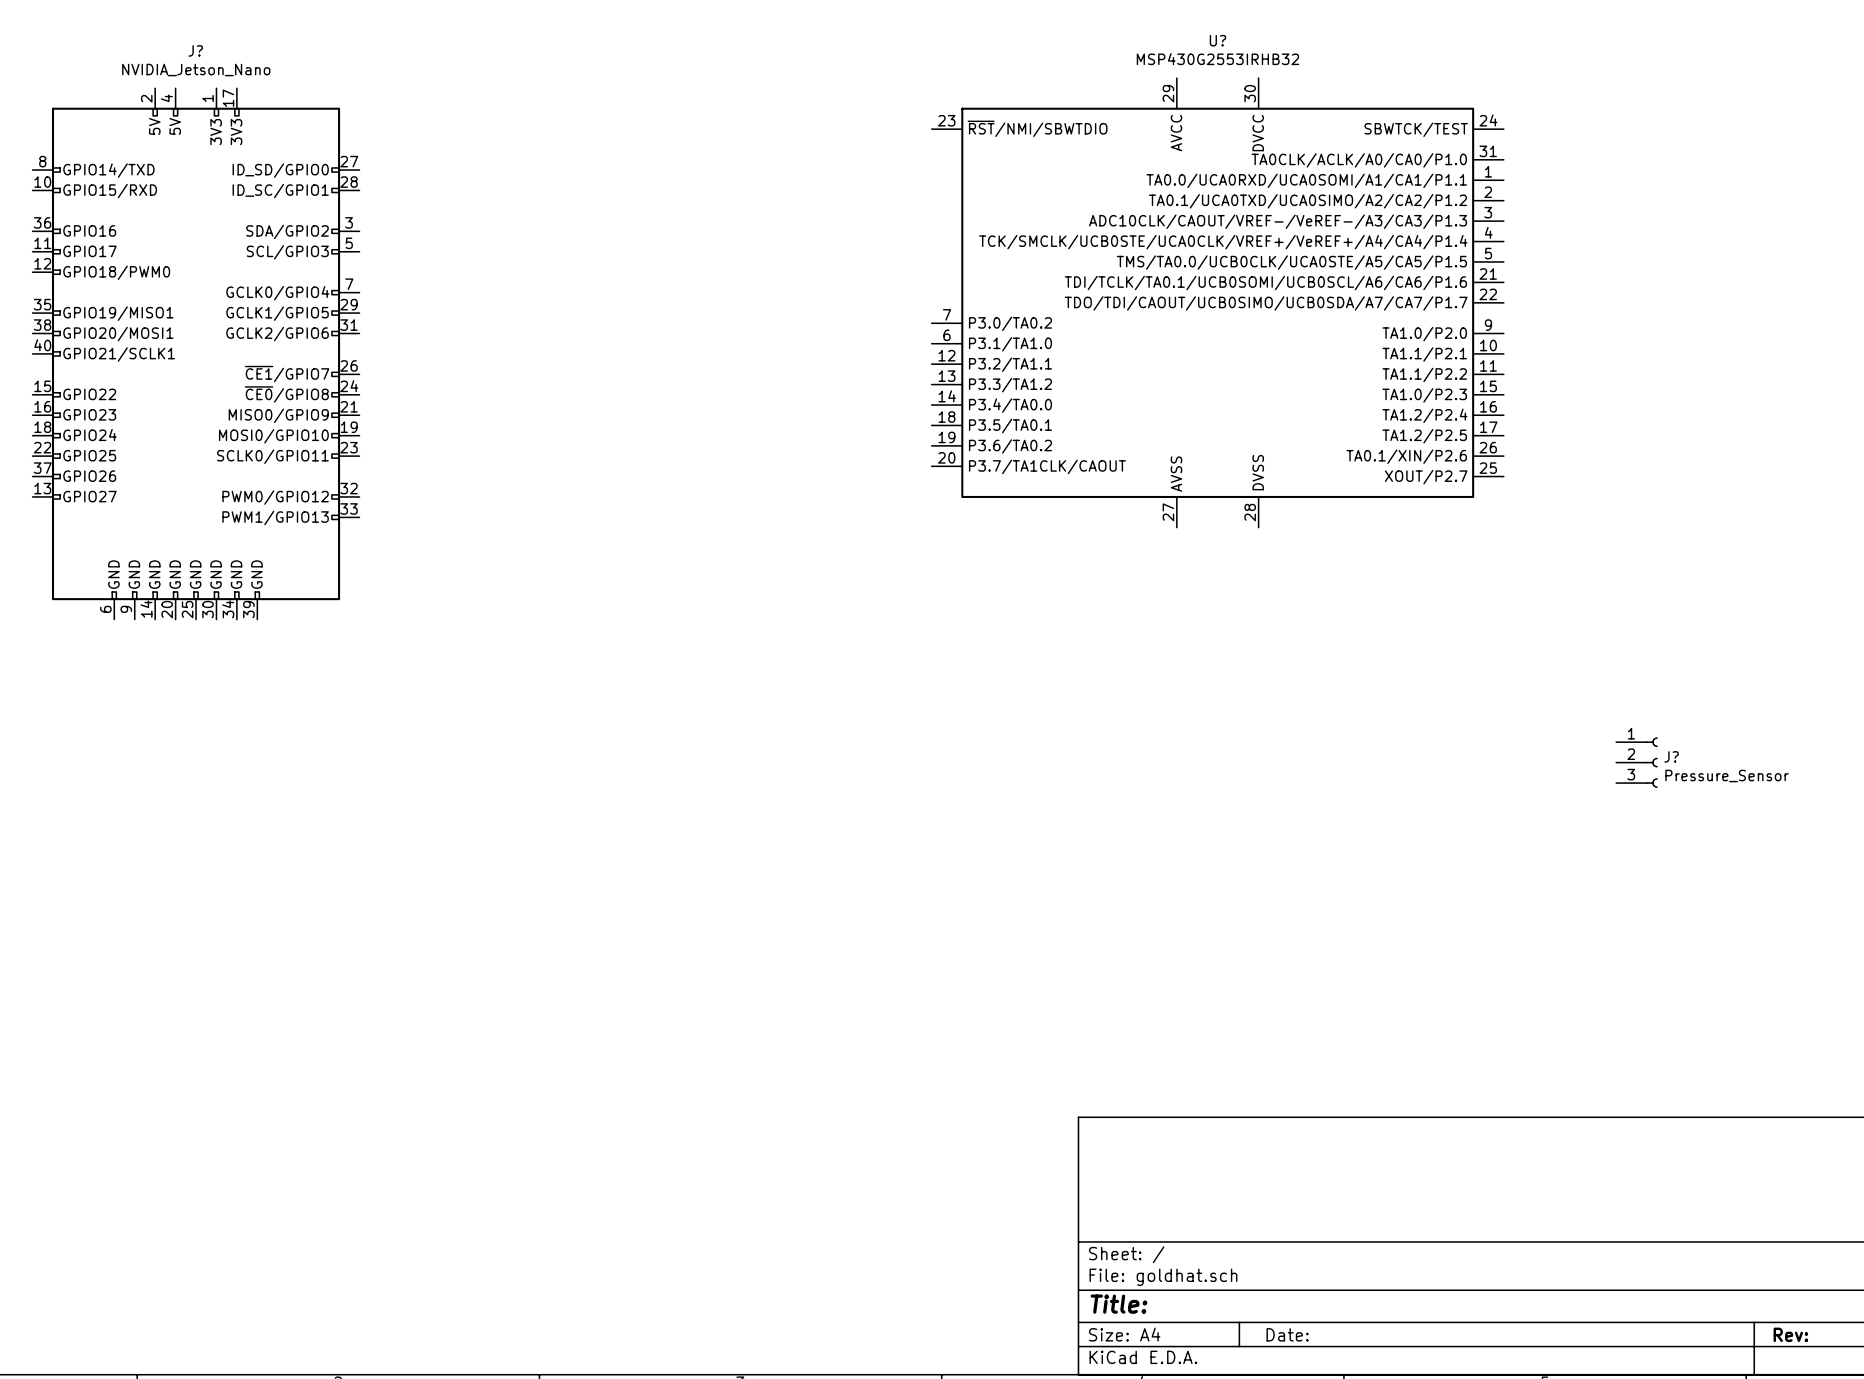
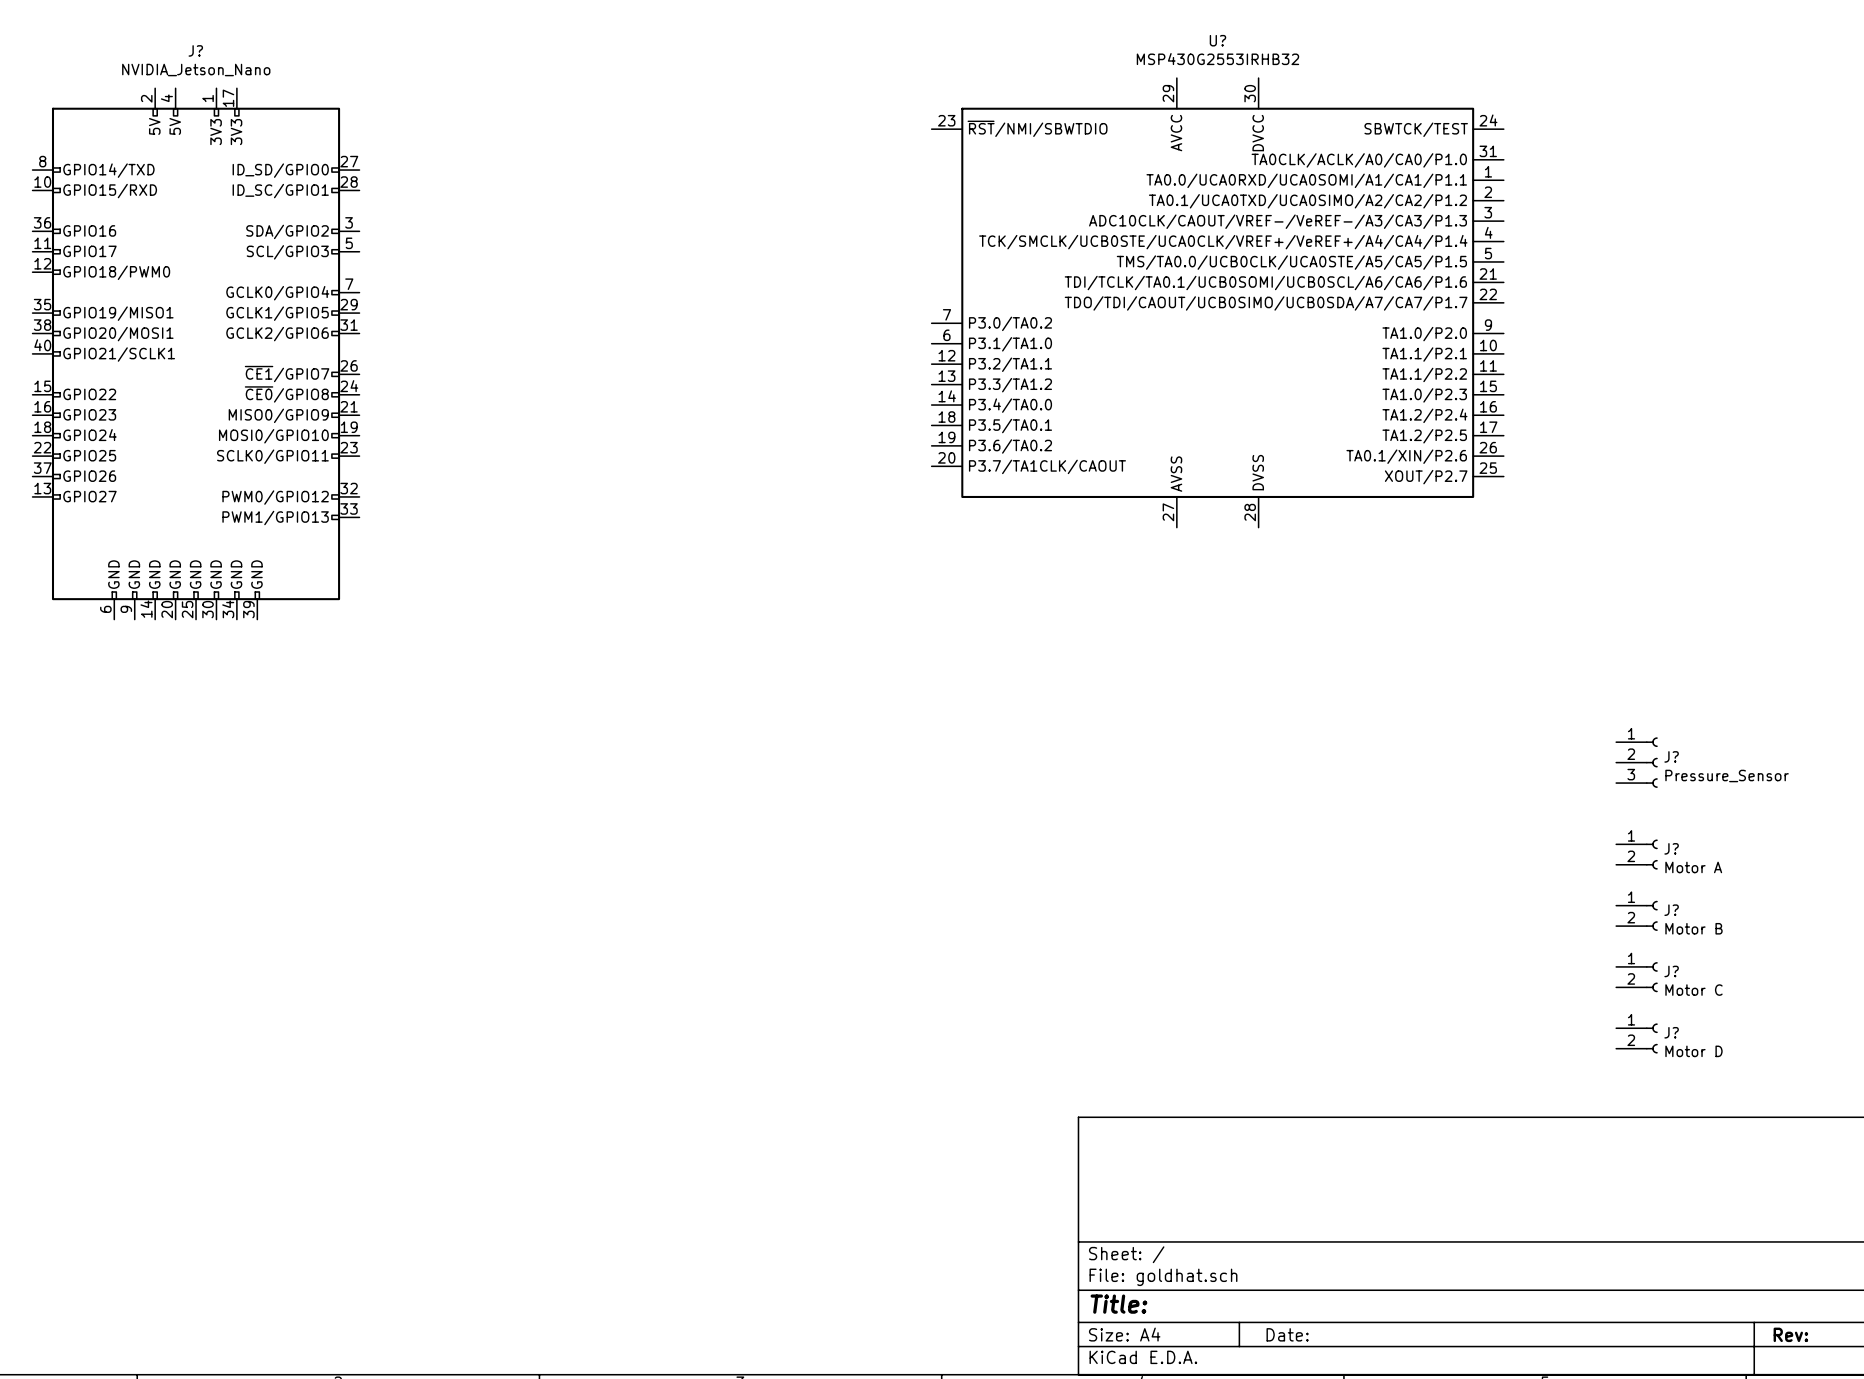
J?: none -> Motor A (1636, 854)
J?: none -> Motor B (1636, 915)
J?: none -> Motor C (1636, 977)
J?: none -> Motor D (1636, 1038)

